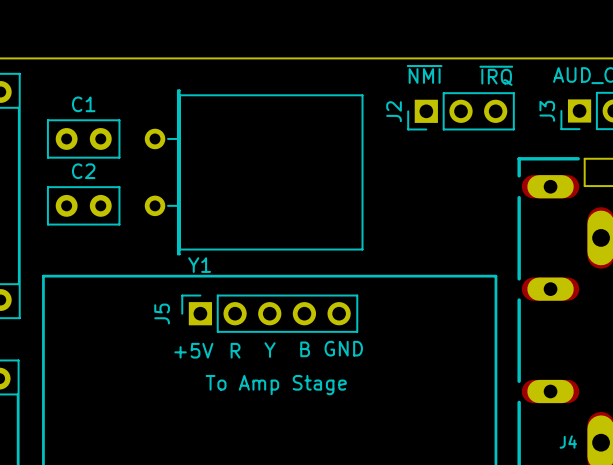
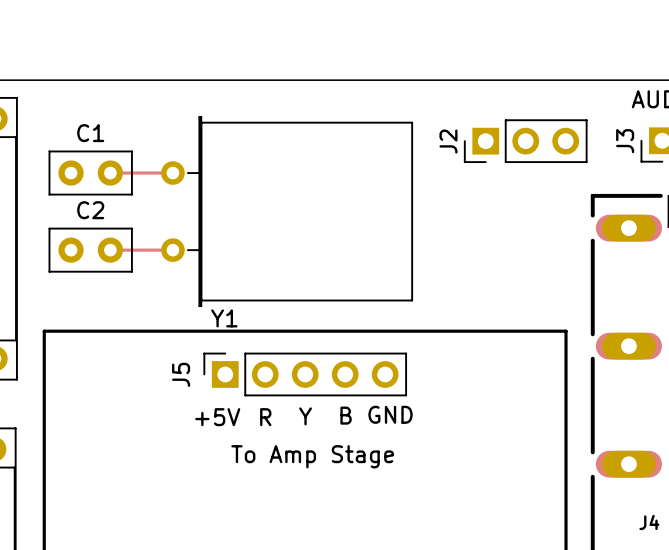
text: ~{NMI} (424, 74) -> none
text: ~{IRQ} (496, 75) -> none
track: none -> (110, 173) (172, 173)
track: none -> (110, 250) (172, 250)

